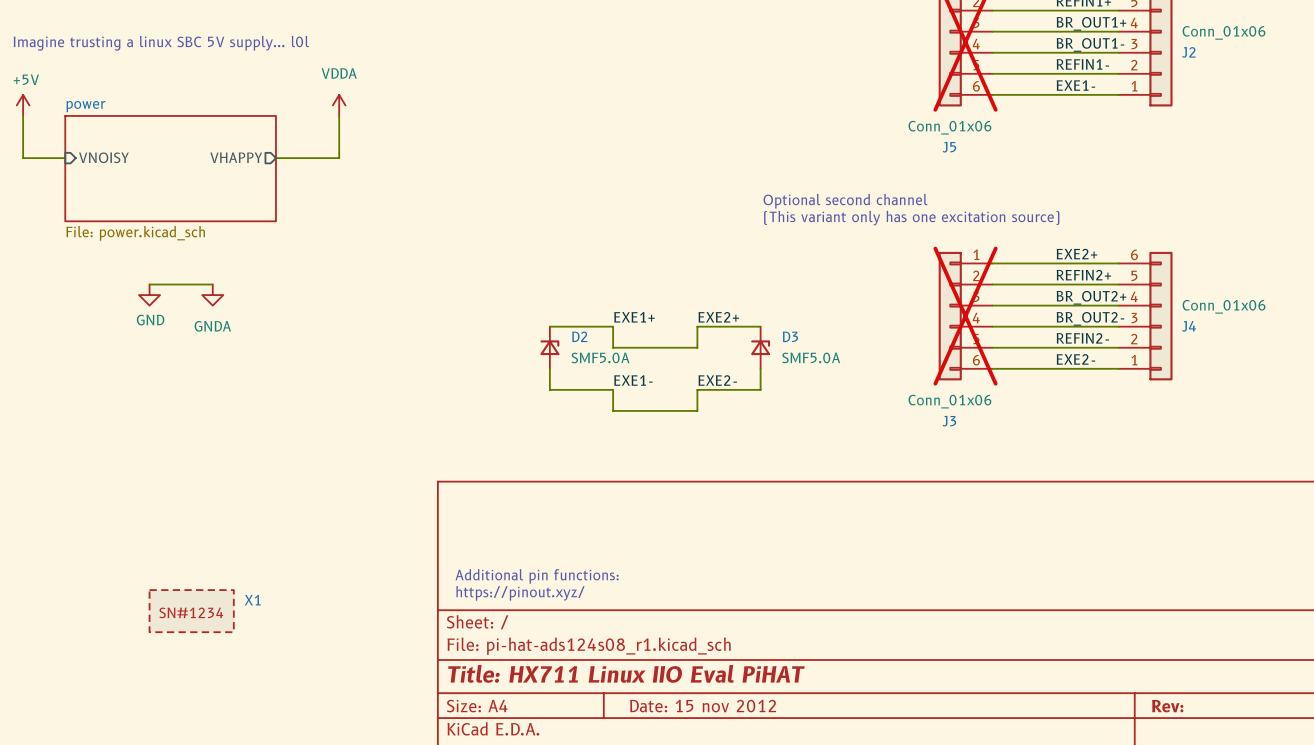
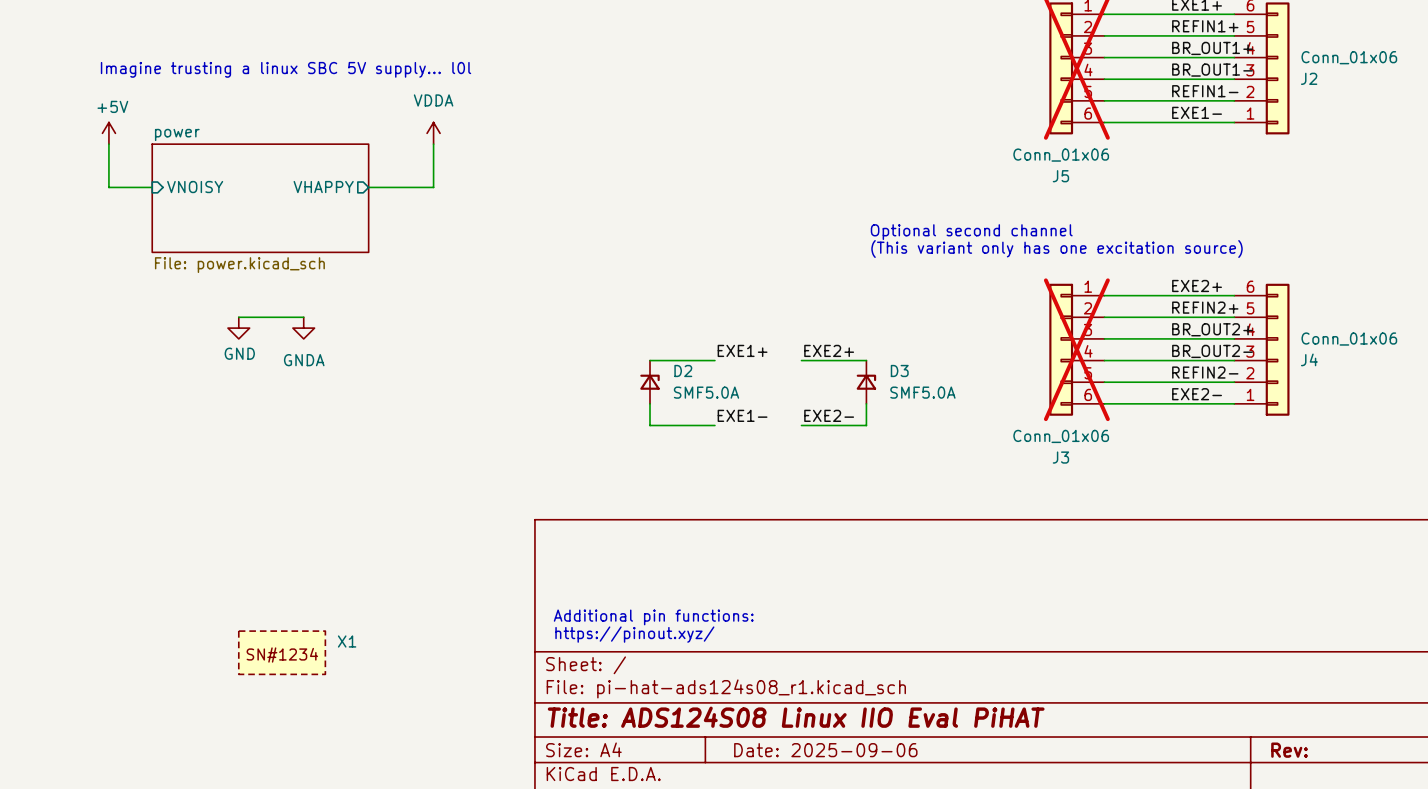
wire: (613, 326) (613, 347) (697, 347) (697, 326) -> none
wire: (613, 389) (613, 410) (697, 410) (697, 389) -> none
title block: Title: HX711 Linux IIO Eval PiHAT (626, 673) -> Title: ADS124S08 Linux IIO Eval PiHAT (796, 717)
title block: Date: 15 nov 2012 (703, 706) -> Date: 2025-09-06 (825, 750)

